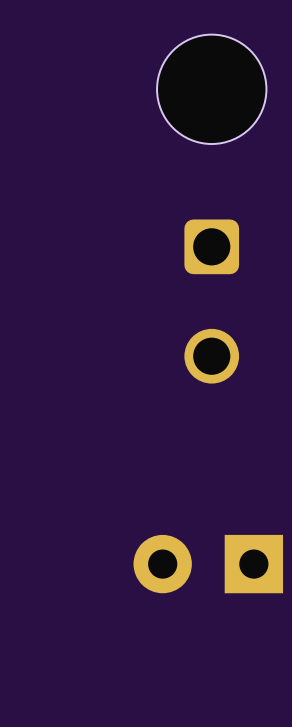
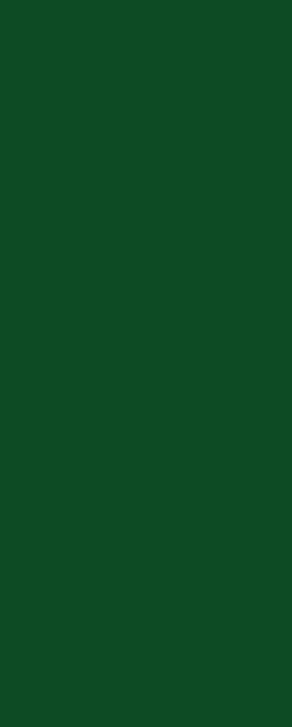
part: (211, 209) -> none
part: (208, 564) -> none

